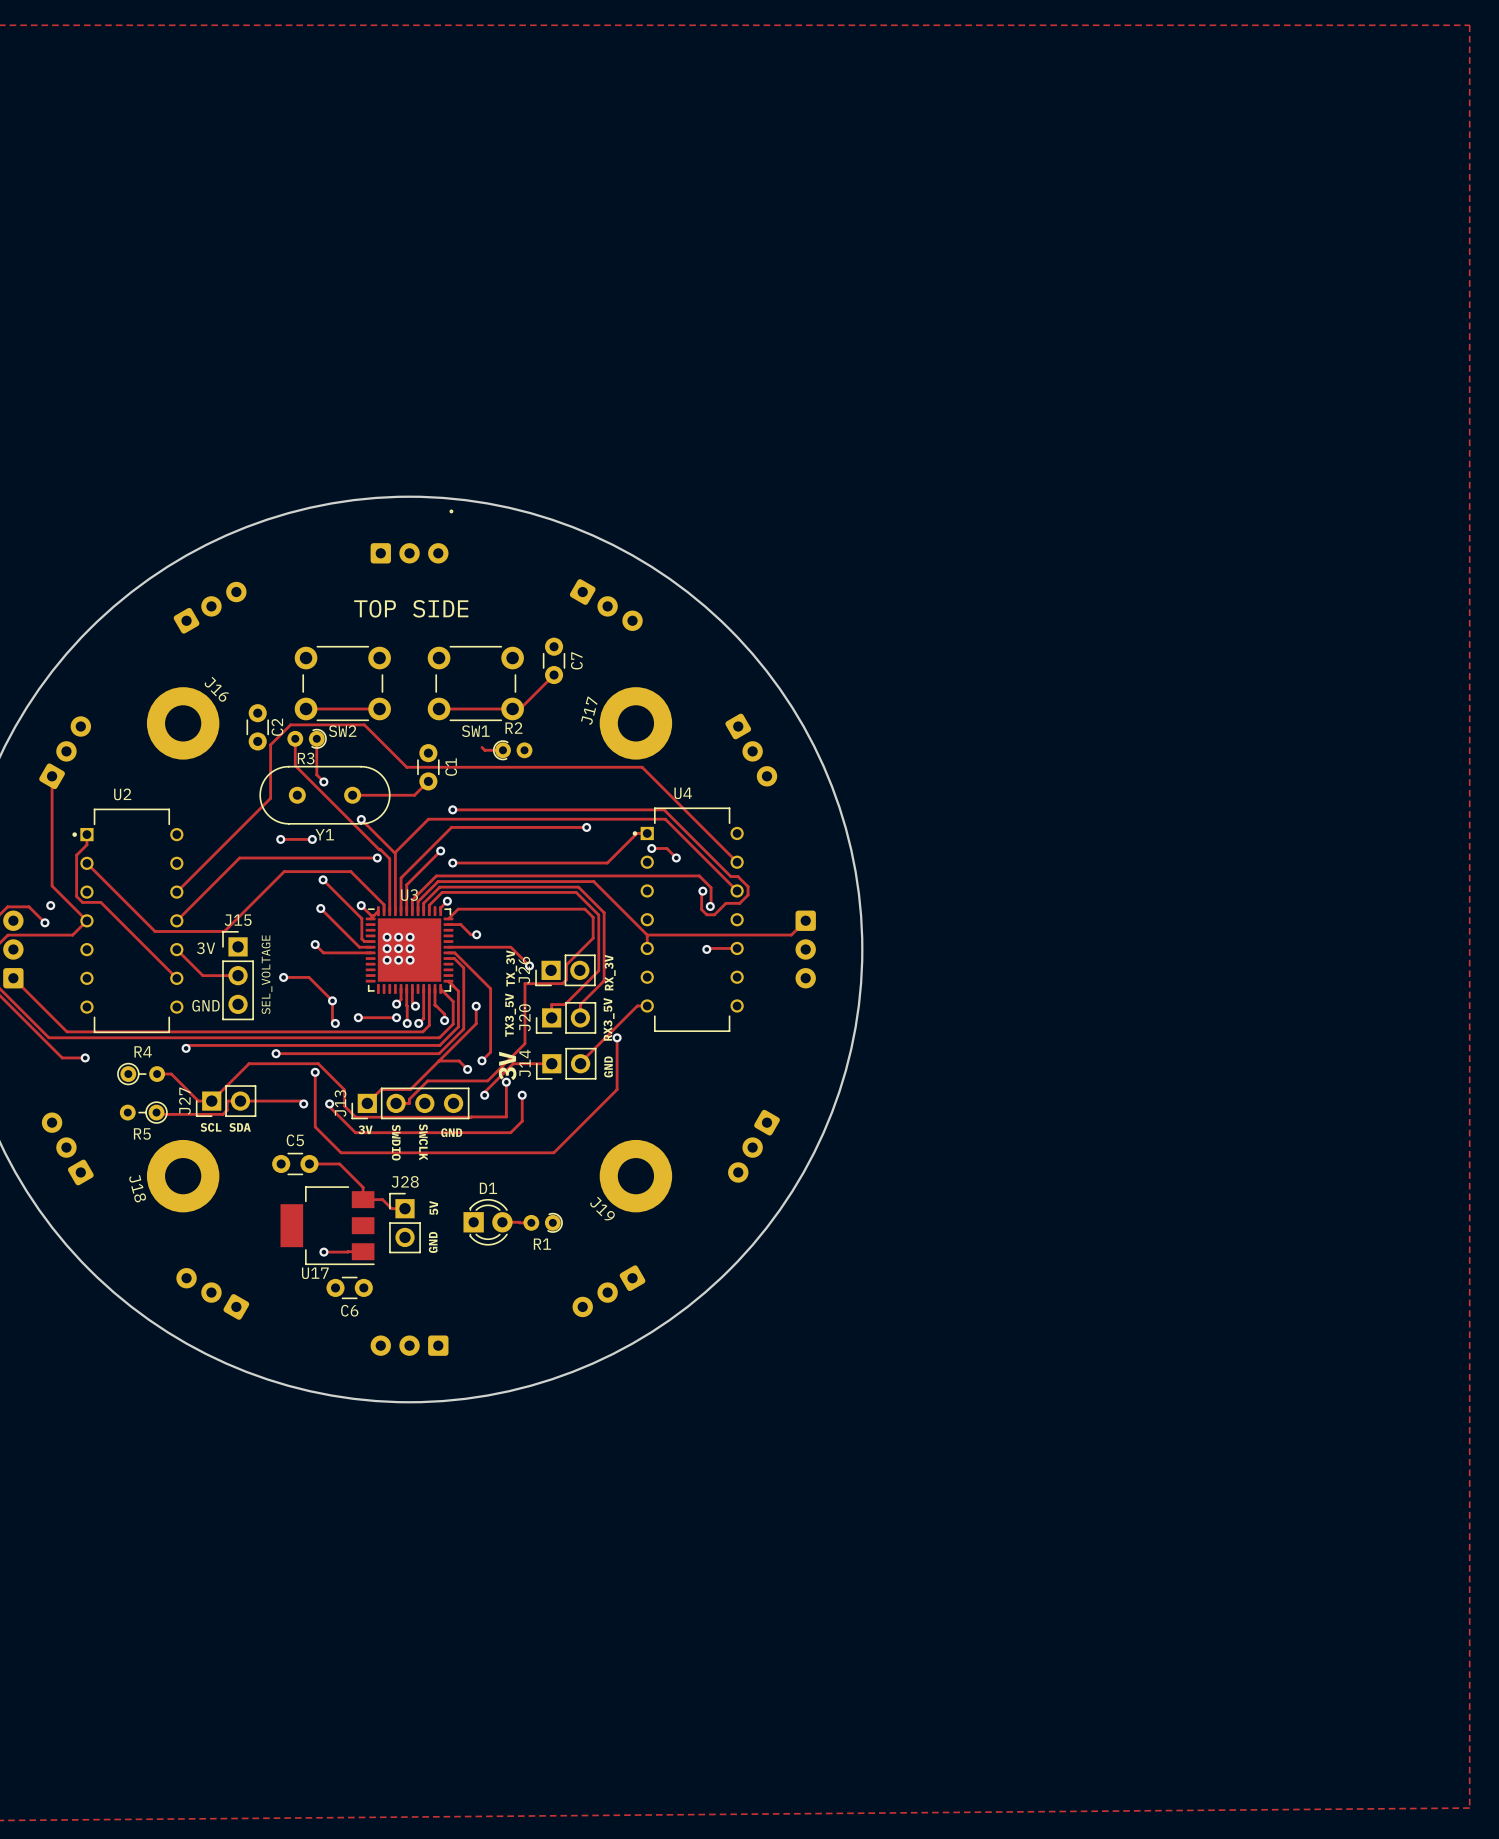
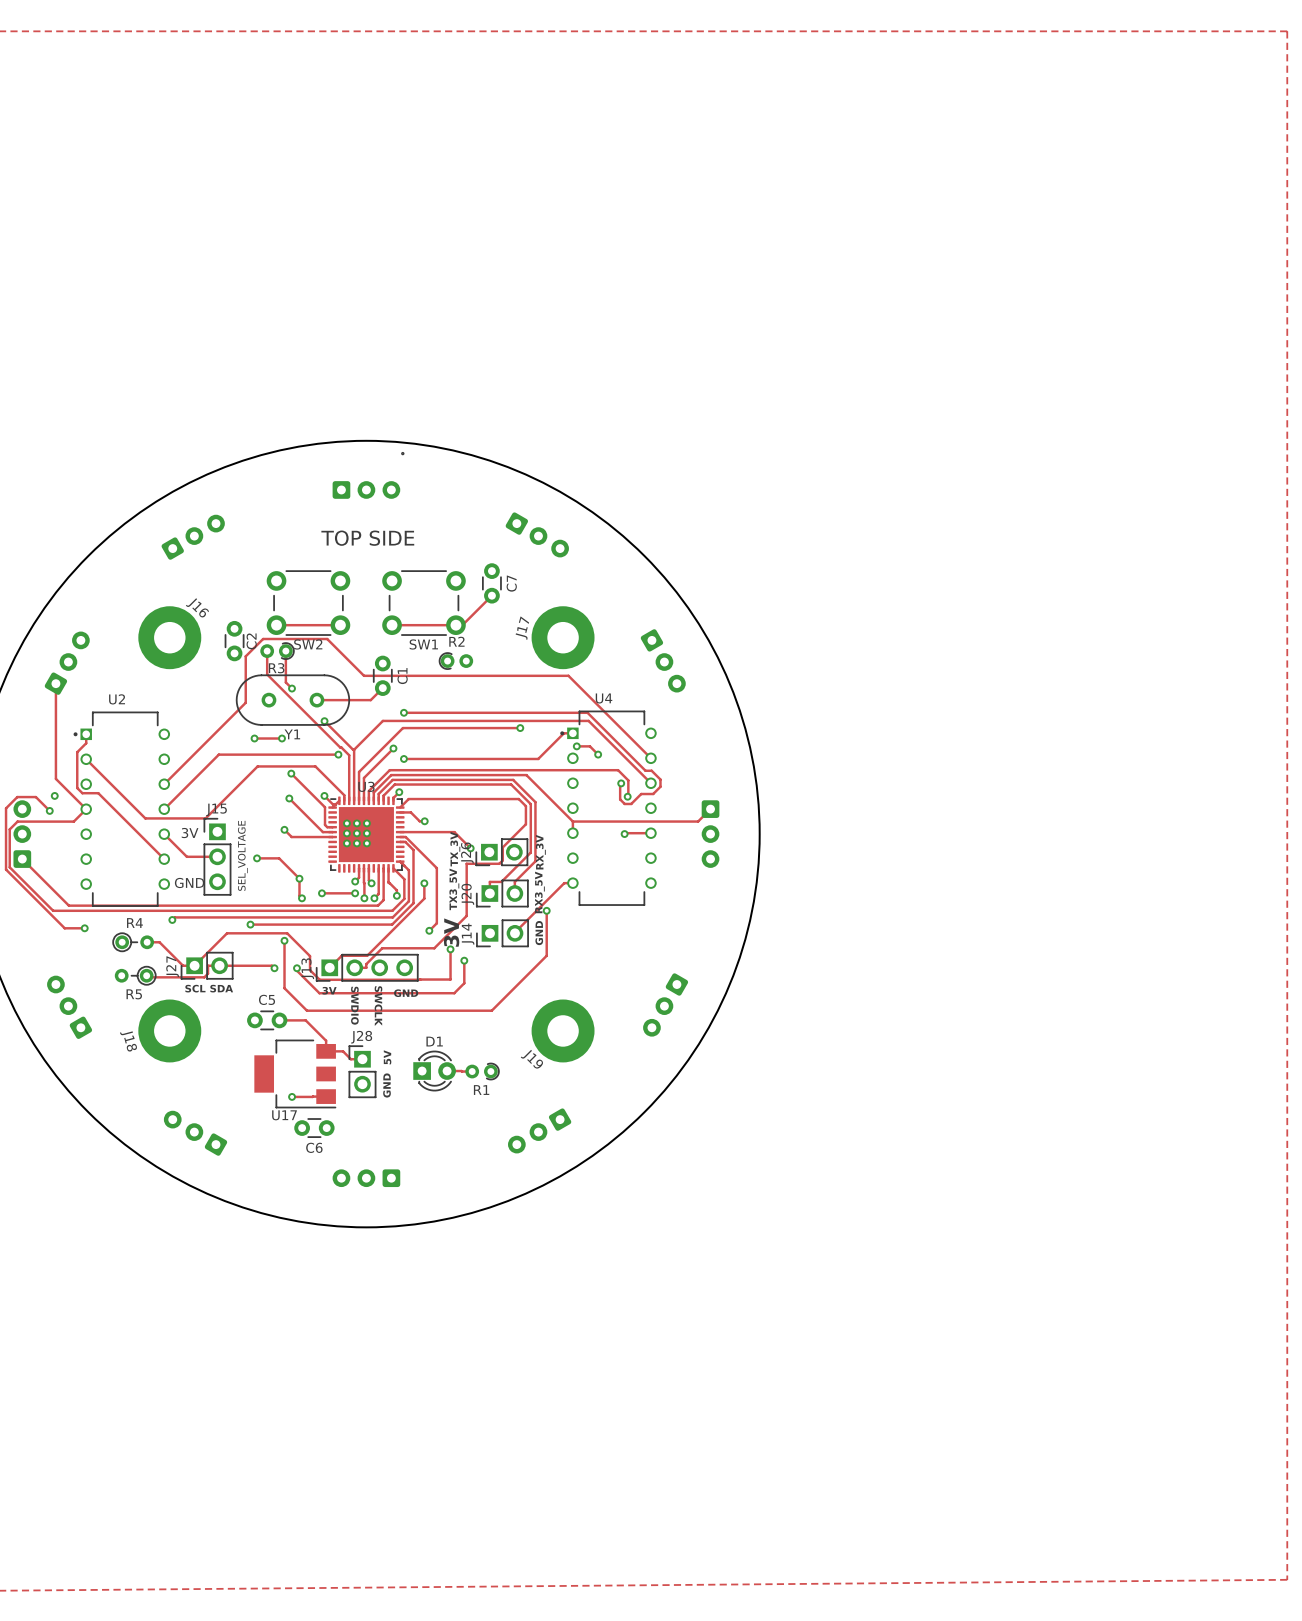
track: (481, 747) (484, 750) (502, 750) -> none
track: (439, 1060) (459, 1060) (467, 1069) -> none
track: (551, 1063) (513, 1063) (484, 1092) (484, 1095) -> none
via: (467, 1069) -> none
via: (484, 1095) -> none

